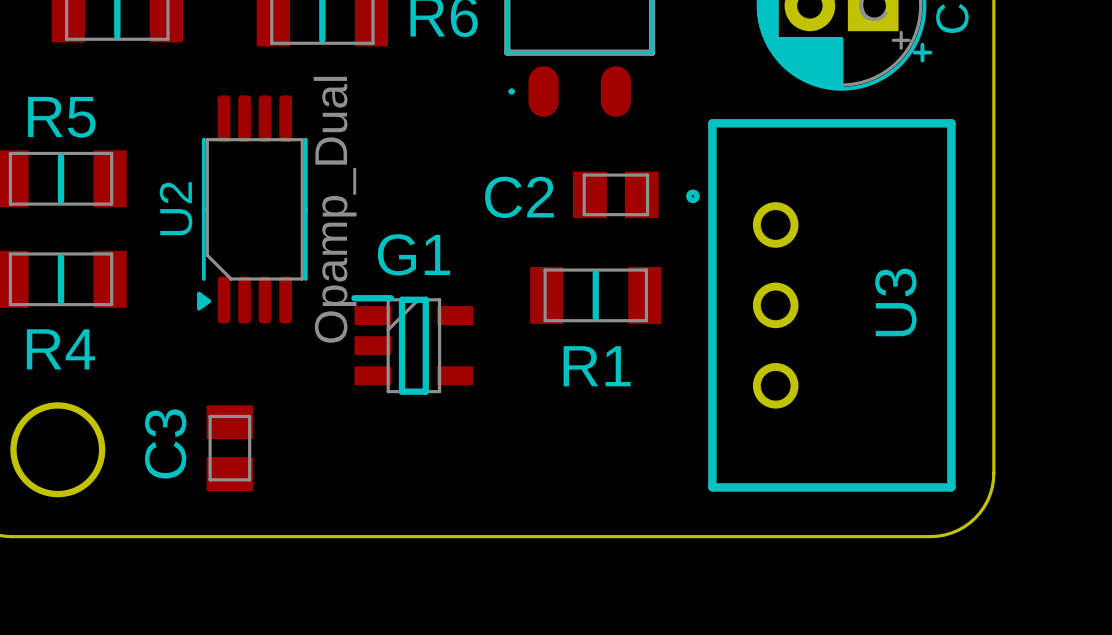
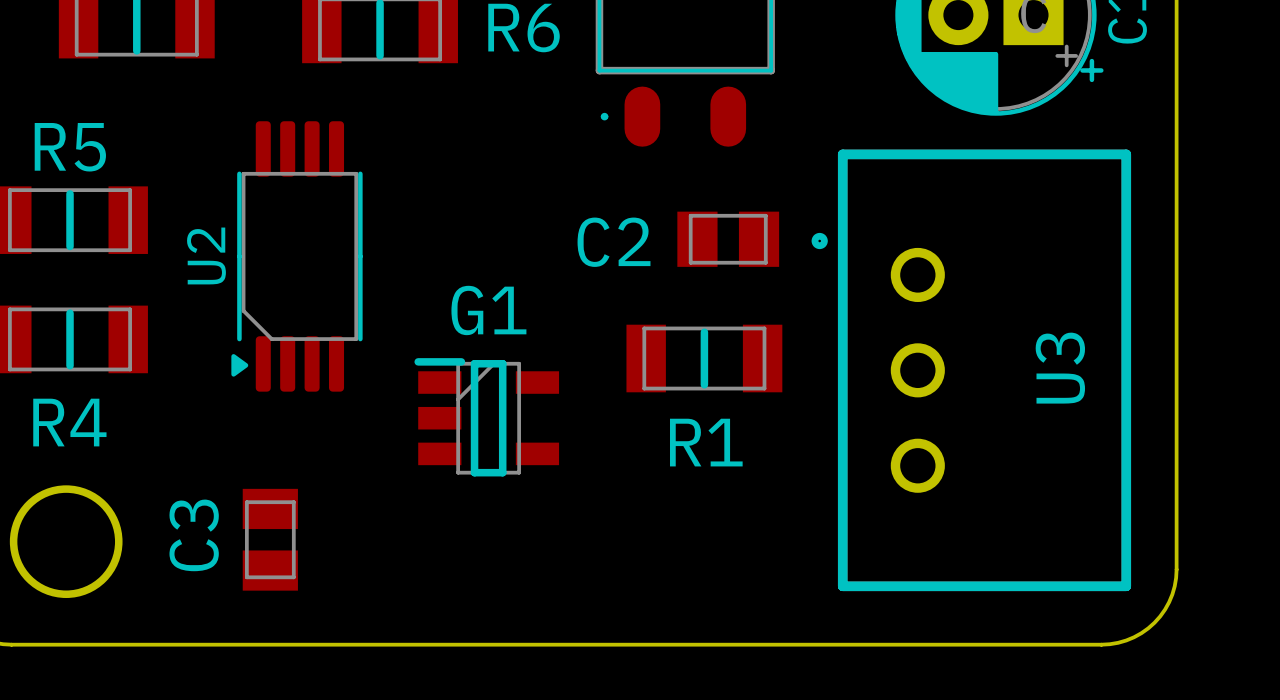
U2 value: Opamp_Dual (335, 209) -> none

